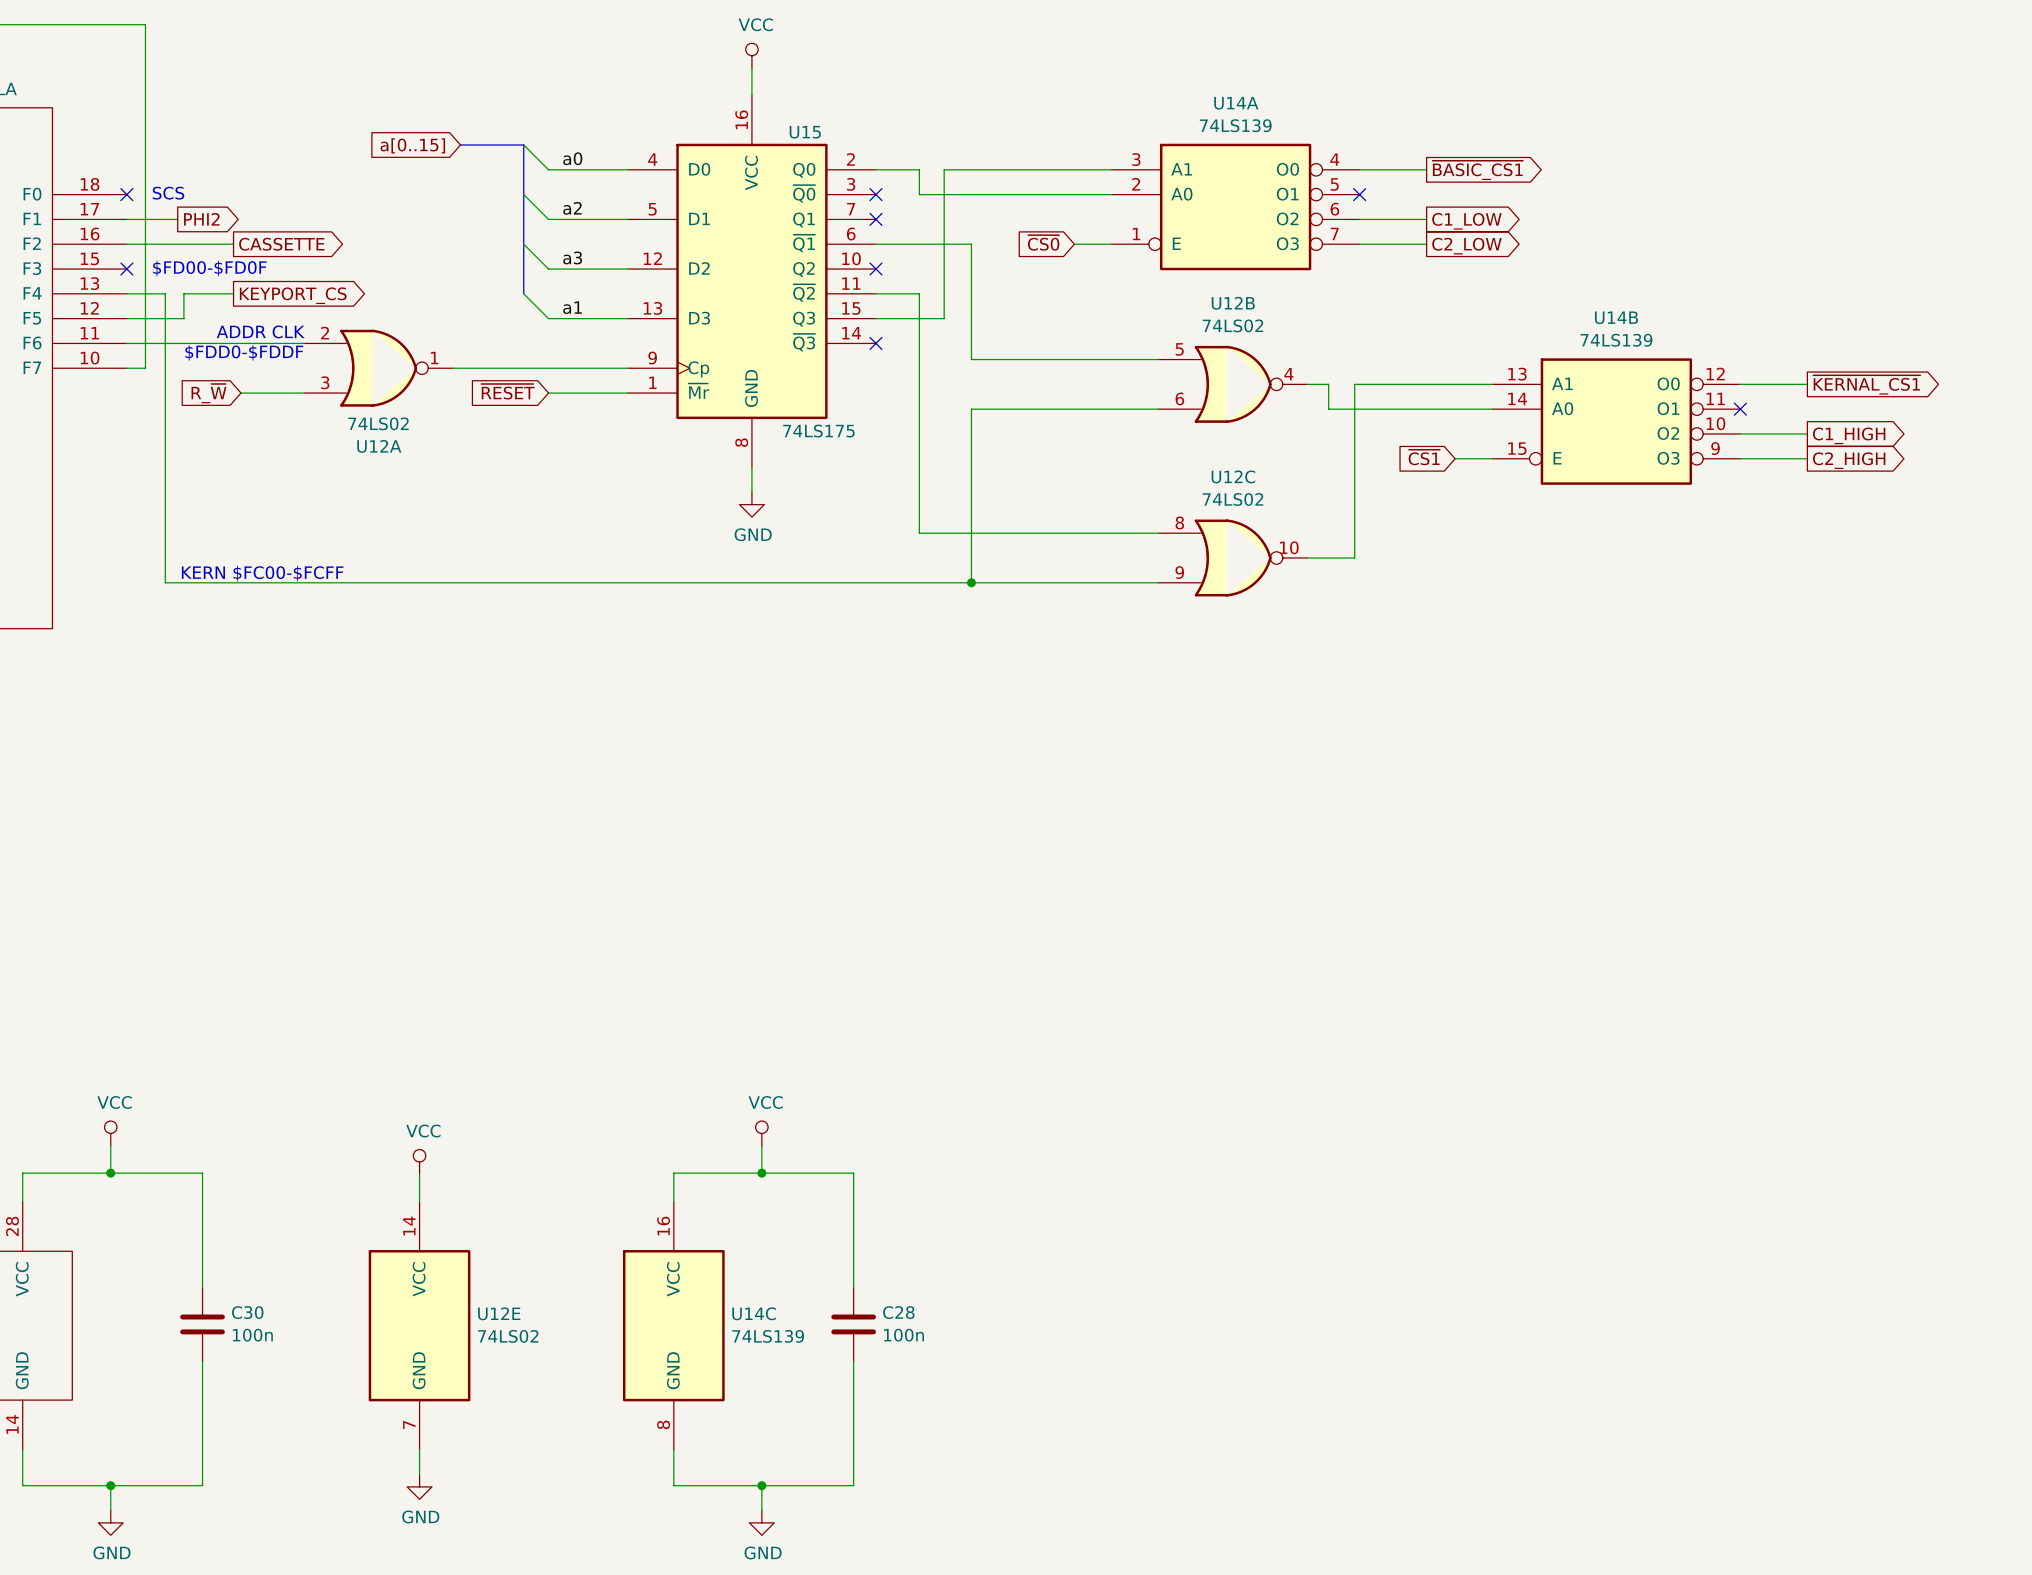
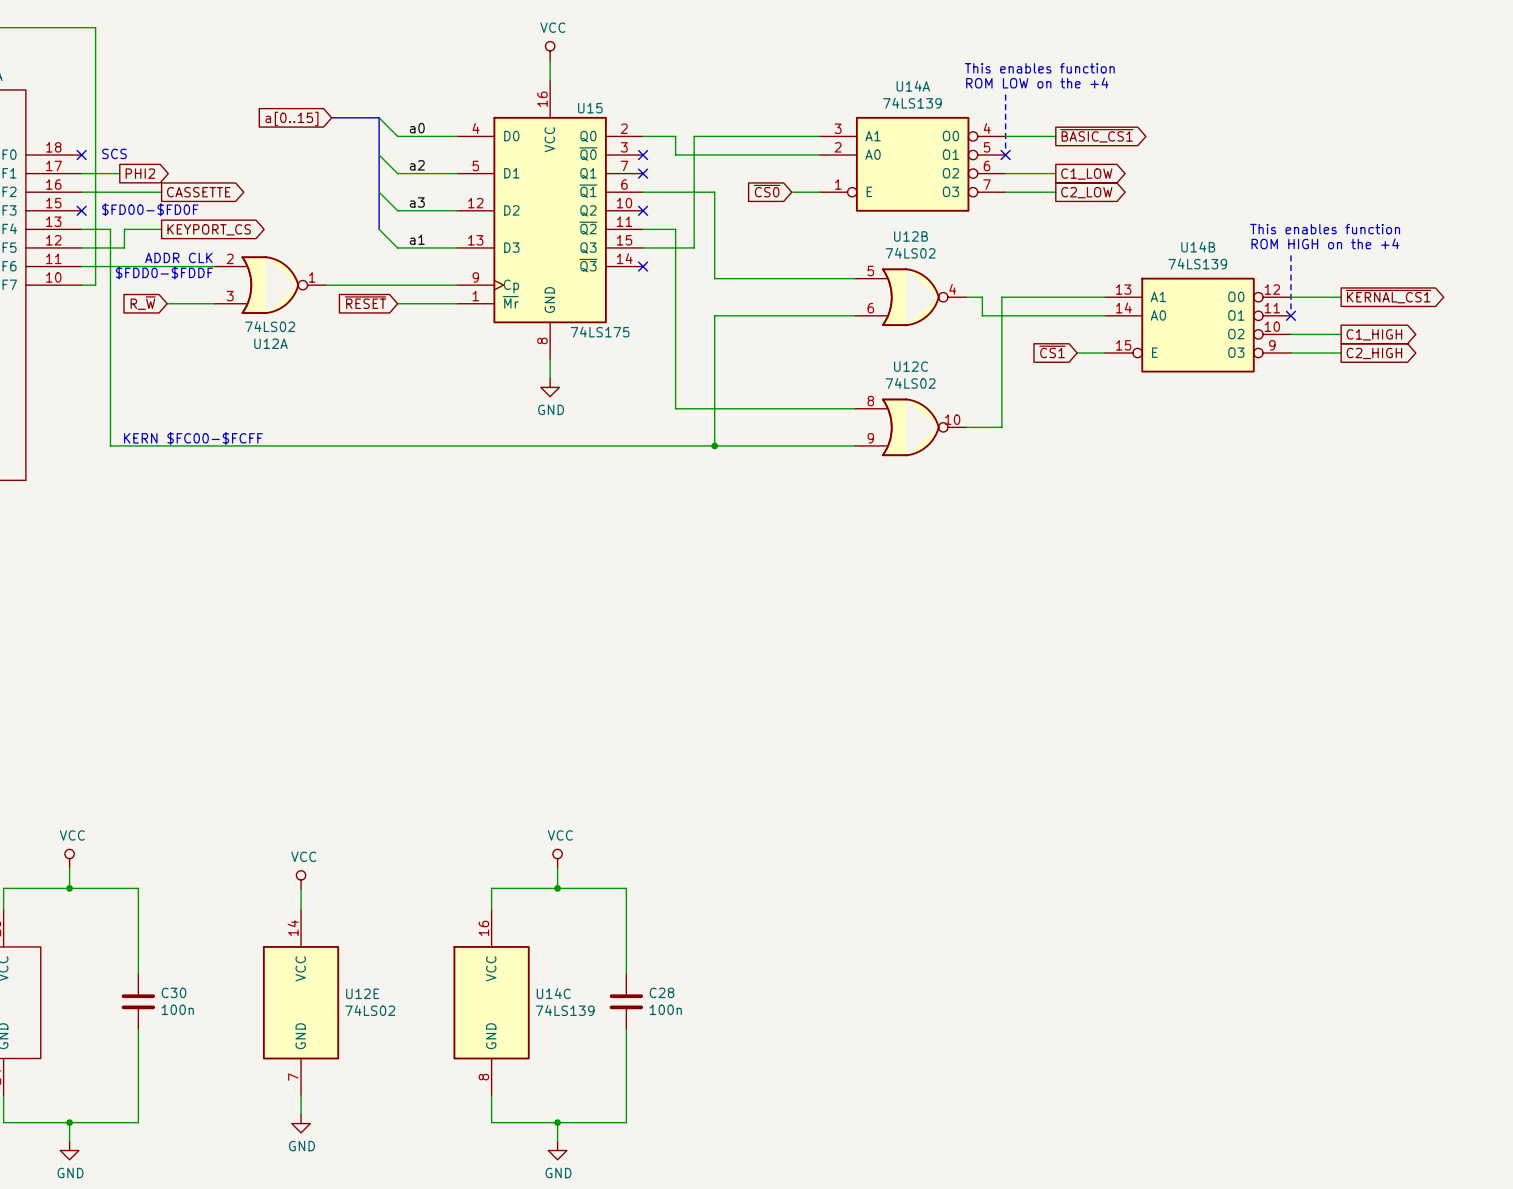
text: none -> This enables function (1039, 68)
text: none -> ROM LOW on the +4 (1037, 83)
line: none -> (1005, 94) (1005, 148)
text: none -> This enables function (1325, 229)
text: none -> ROM HIGH on the +4 (1325, 243)
line: none -> (1290, 255) (1290, 309)

